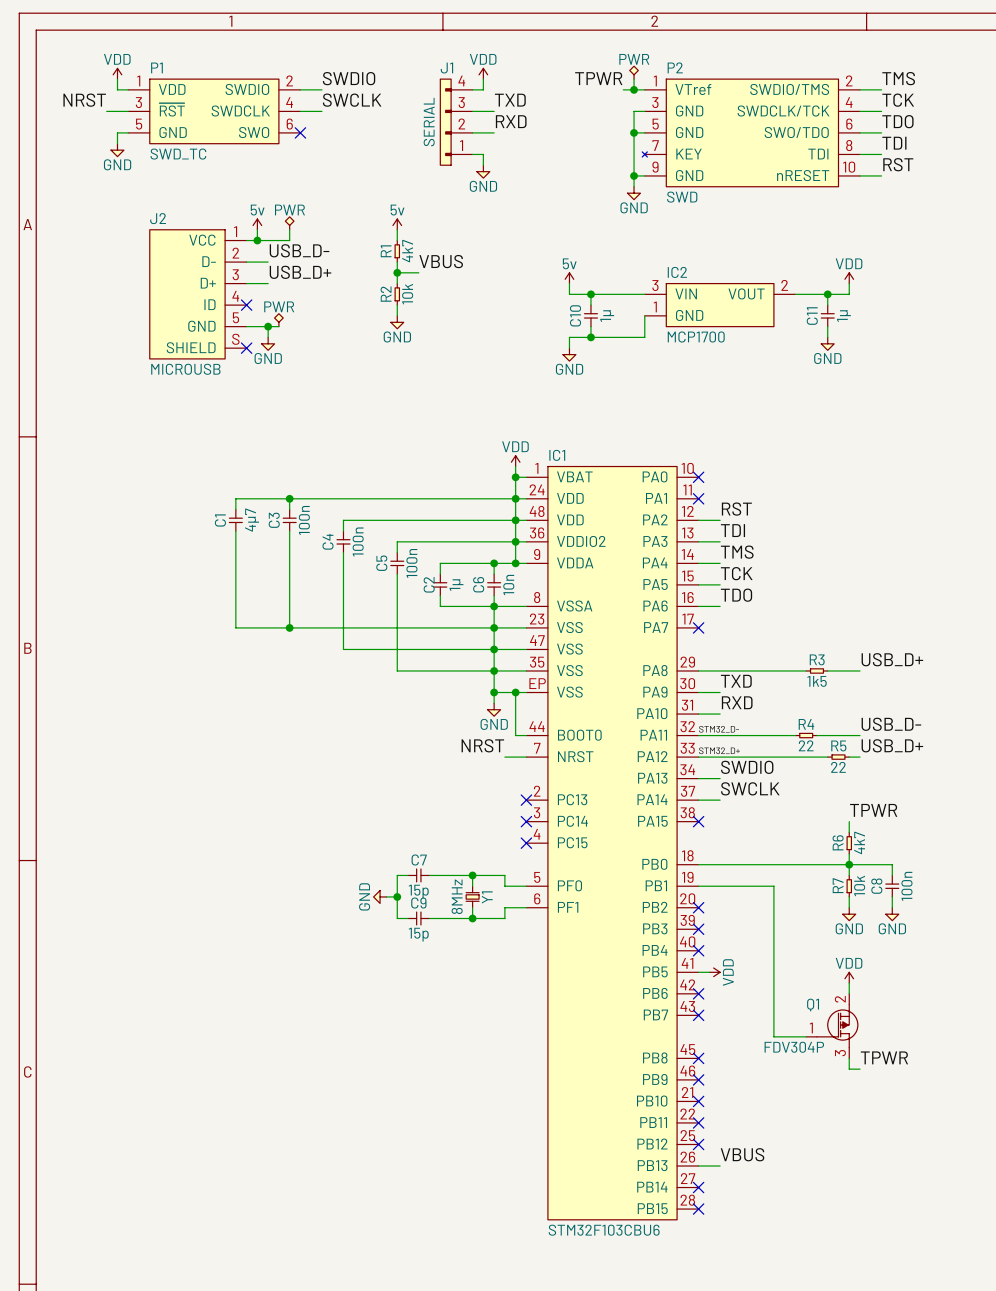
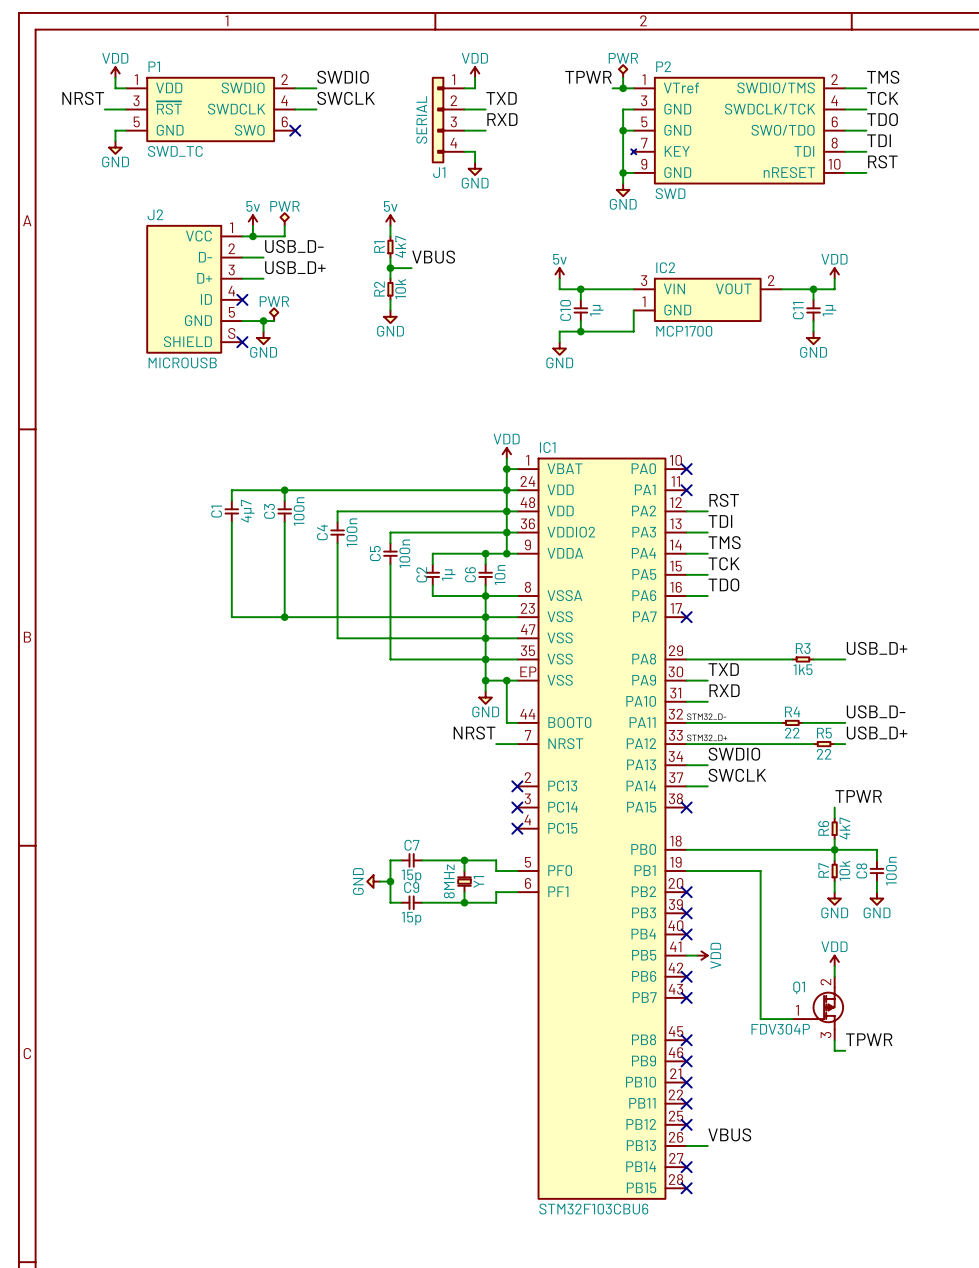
J1 flip: as is (445, 122) -> up-down (438, 120)

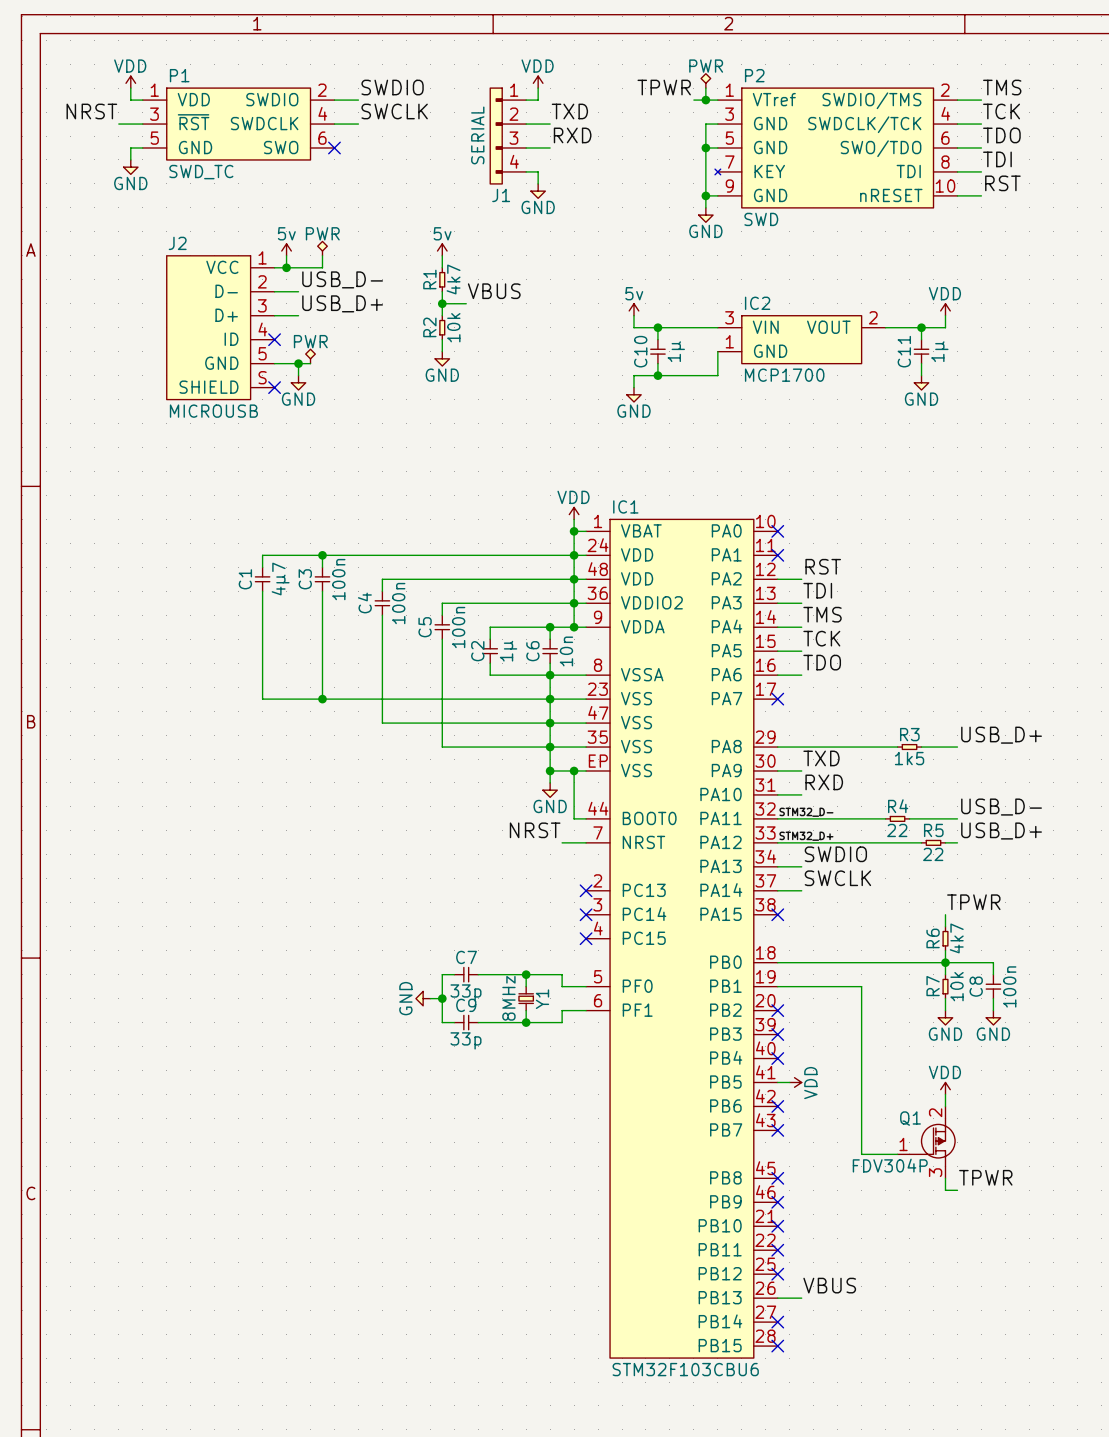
C7 value: 15p (411, 876) -> 33p (465, 992)
C9 value: 15p (411, 918) -> 33p (465, 1040)

